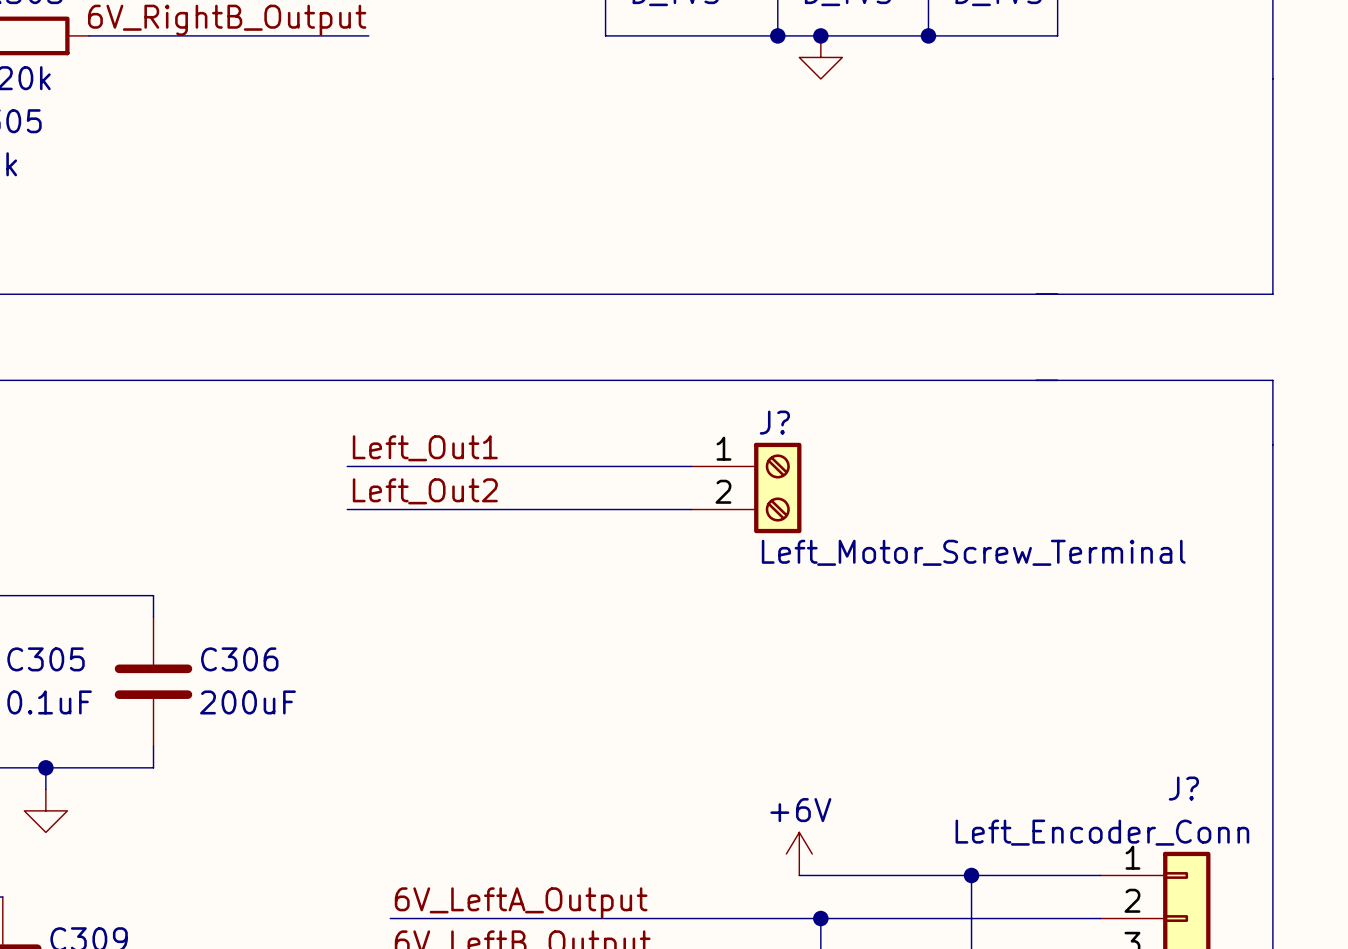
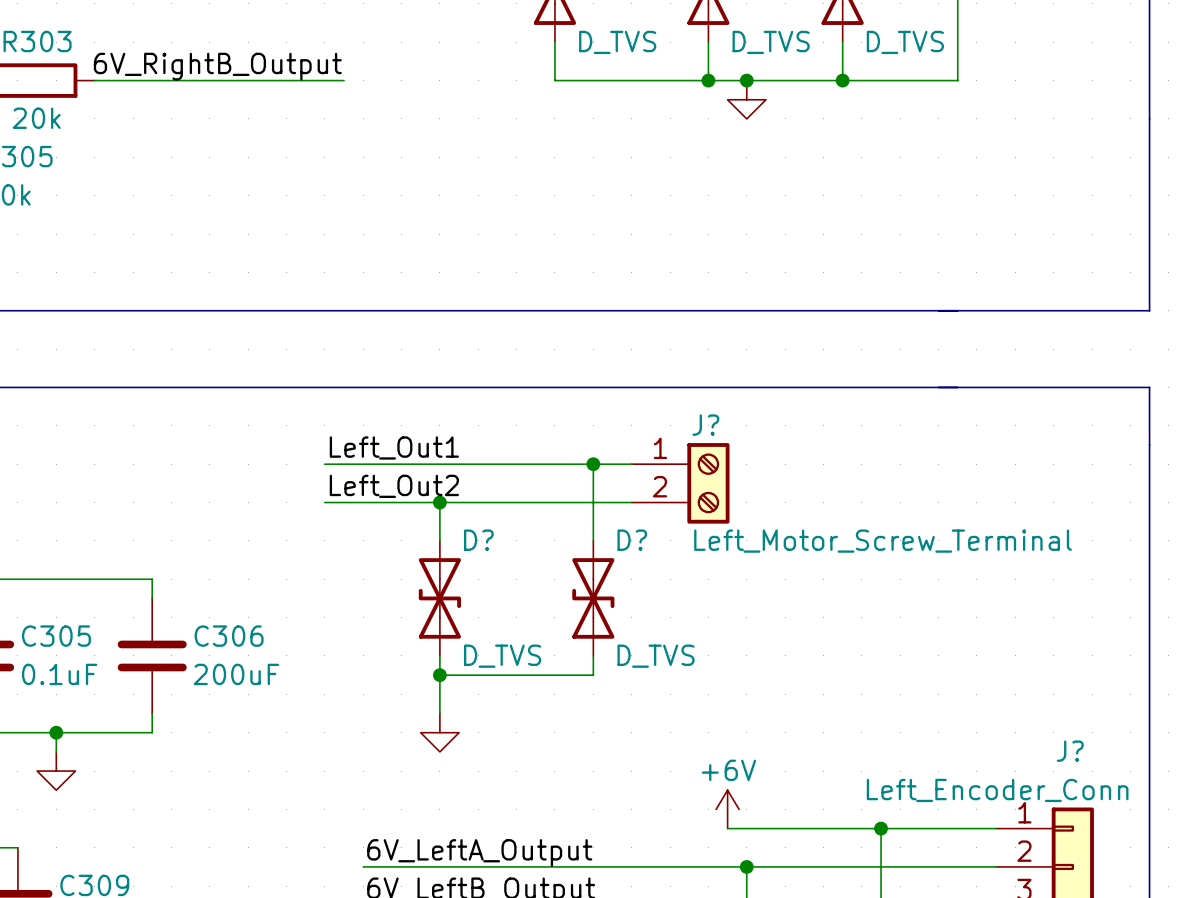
wire: none -> (593, 464) (593, 540)
junction: none -> (593, 464)
wire: none -> (439, 502) (439, 540)
junction: none -> (439, 502)
D?: none -> D_TVS (439, 598)
D?: none -> D_TVS (593, 598)
wire: none -> (439, 655) (439, 713)
wire: none -> (593, 655) (593, 675) (439, 675)
junction: none -> (439, 675)
power symbol: none -> (439, 732)

